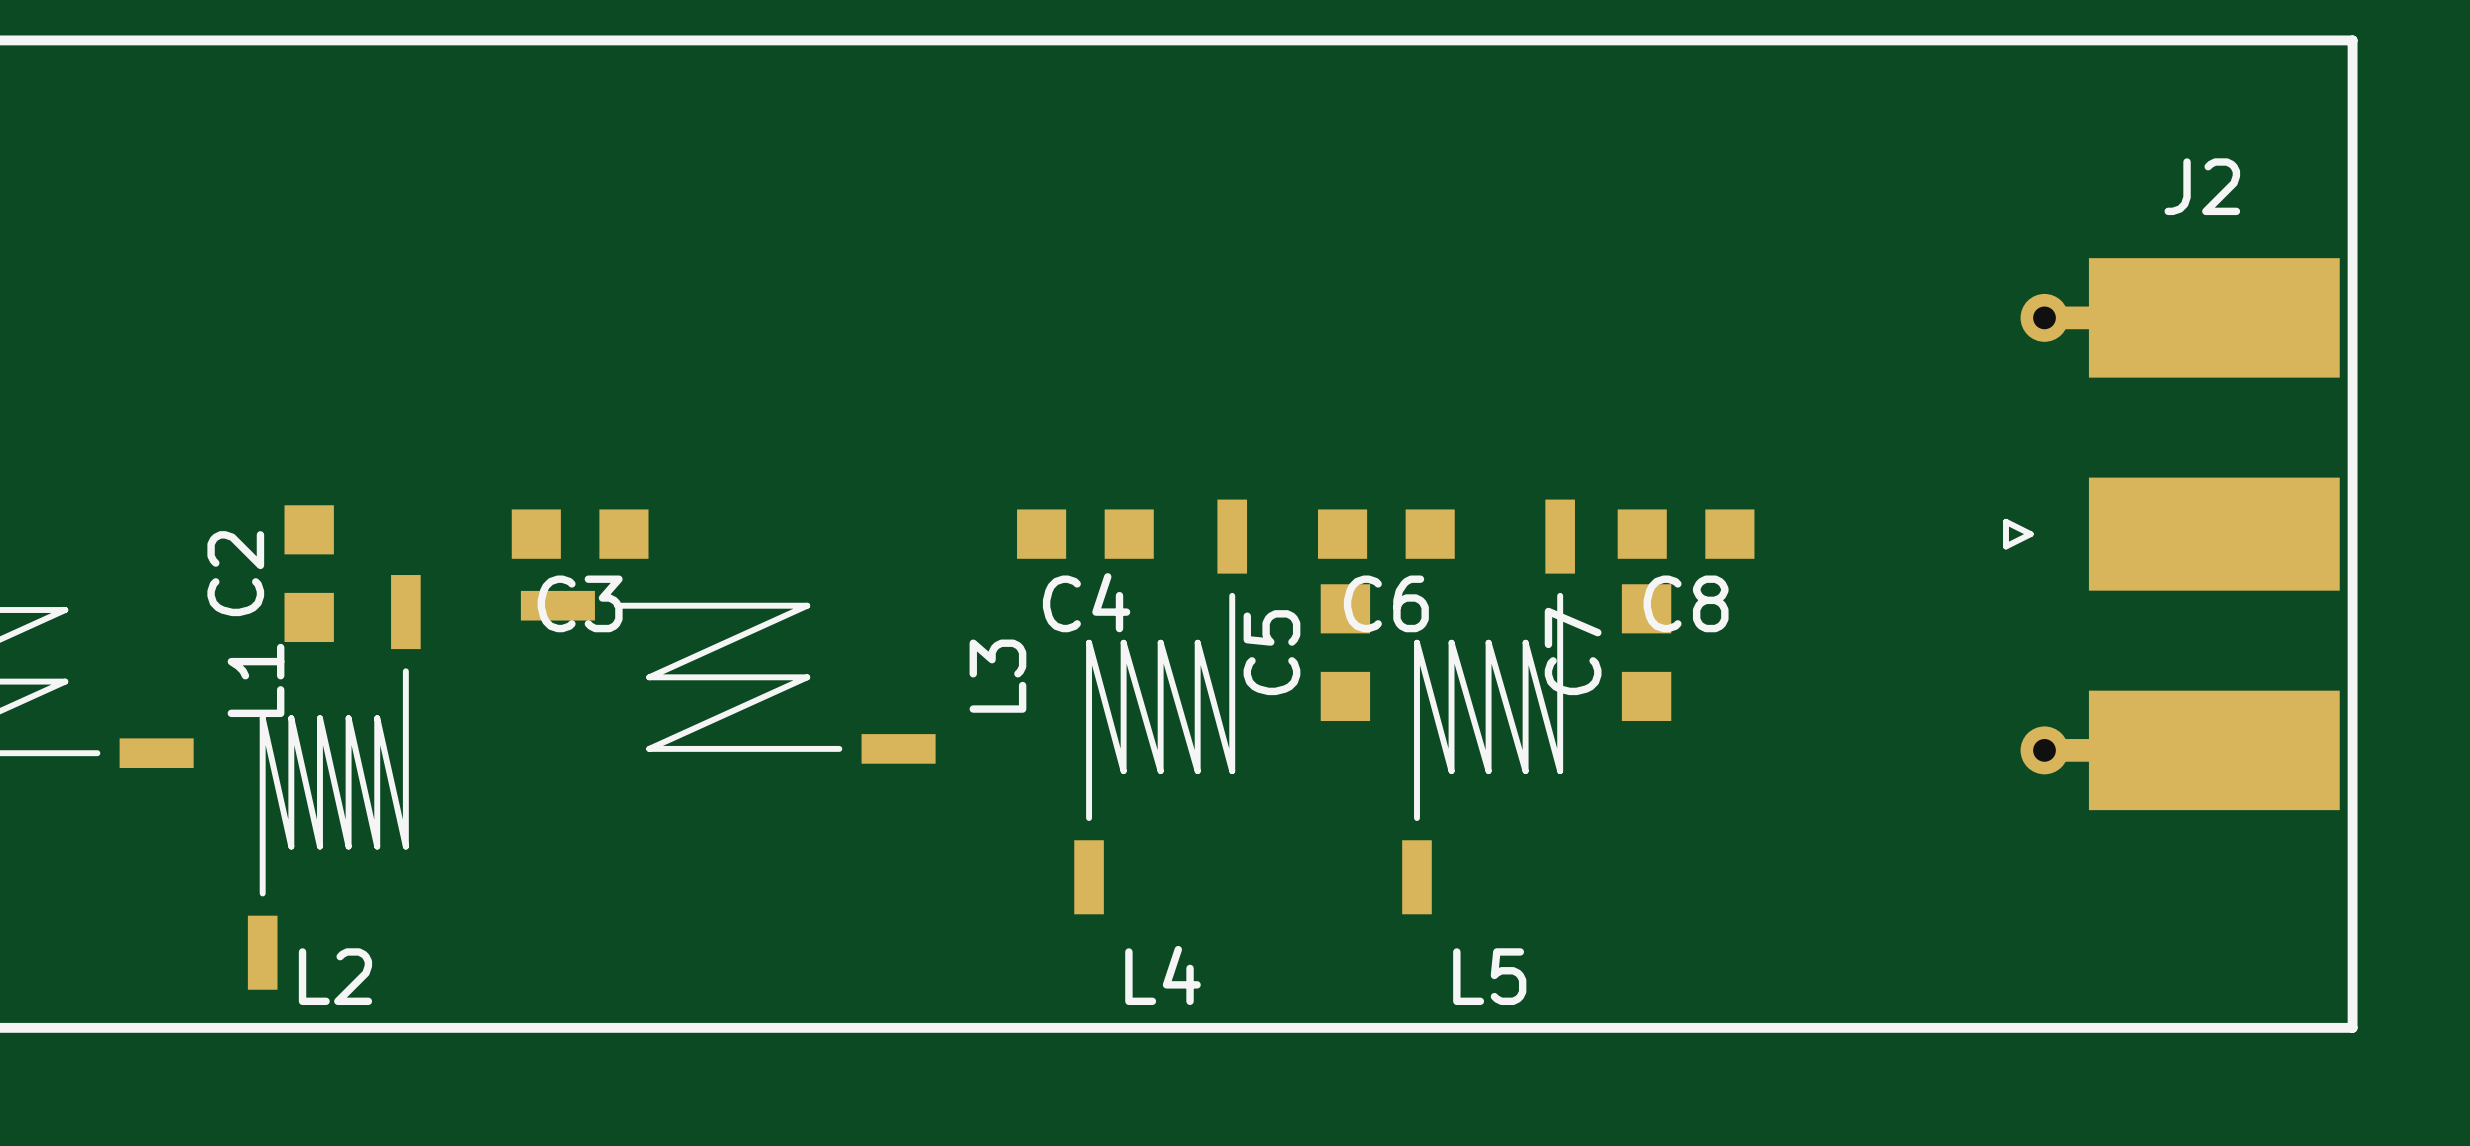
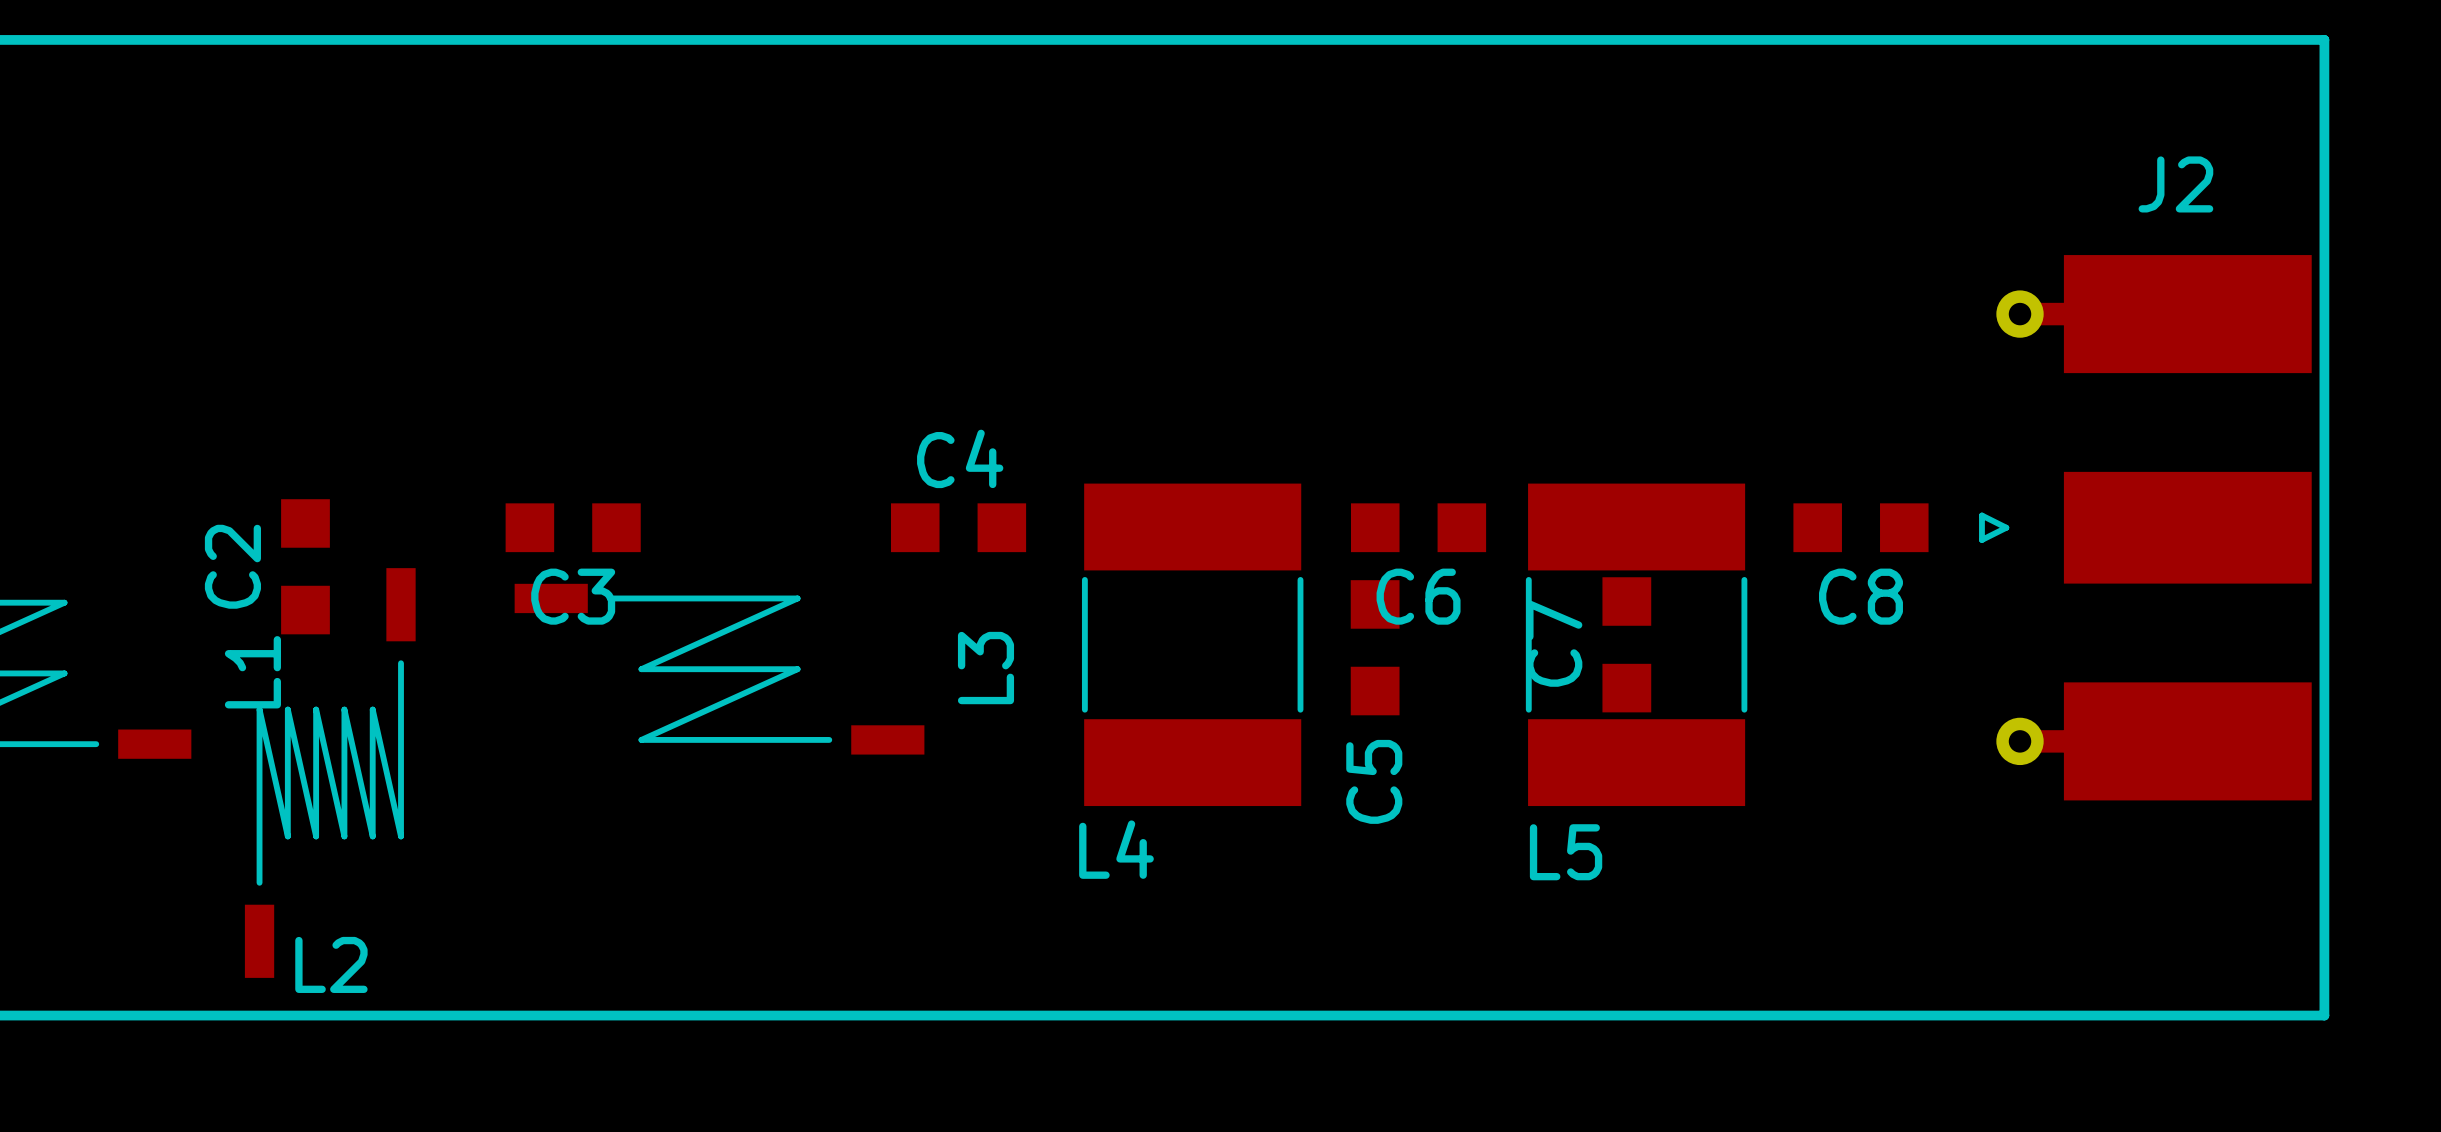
L4 footprint: [1074, 499, 1248, 915] -> [1081, 483, 1304, 807]
L5 footprint: [1402, 499, 1575, 915] -> [1525, 483, 1748, 807]
C4 position: (1085, 534) -> (958, 527)
C6 position: (1386, 534) -> (1418, 527)
C8 position: (1686, 534) -> (1860, 527)
C4 name position: C4 (1086, 602) -> C4 (960, 458)
C5 name position: C5 (1271, 652) -> C5 (1374, 781)
C5 position: (1345, 652) -> (1375, 647)
L4 name position: L4 (1163, 975) -> L4 (1116, 849)

